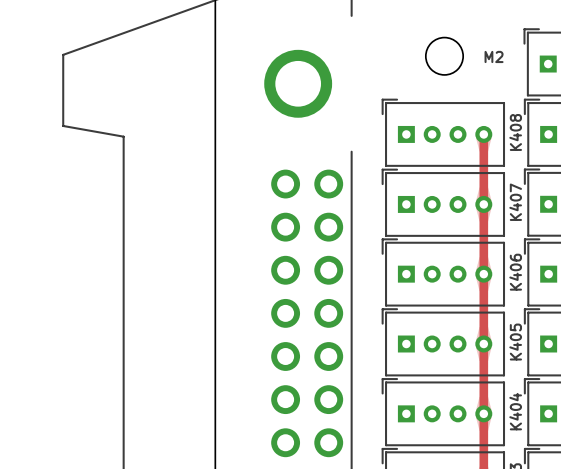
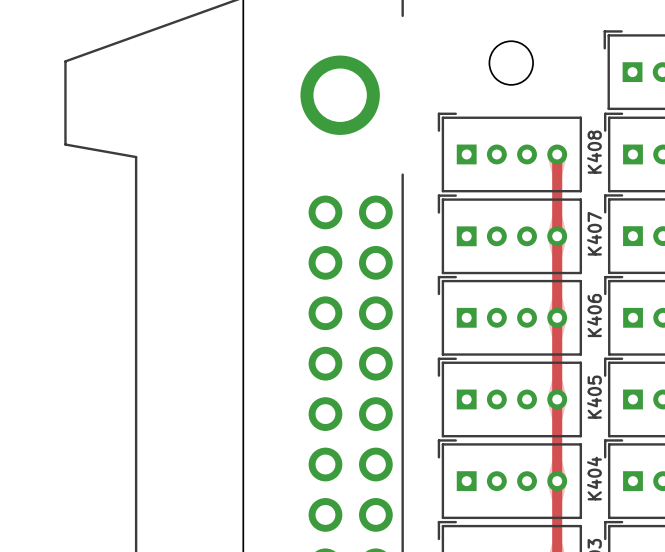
text: M2 (494, 56) -> none

